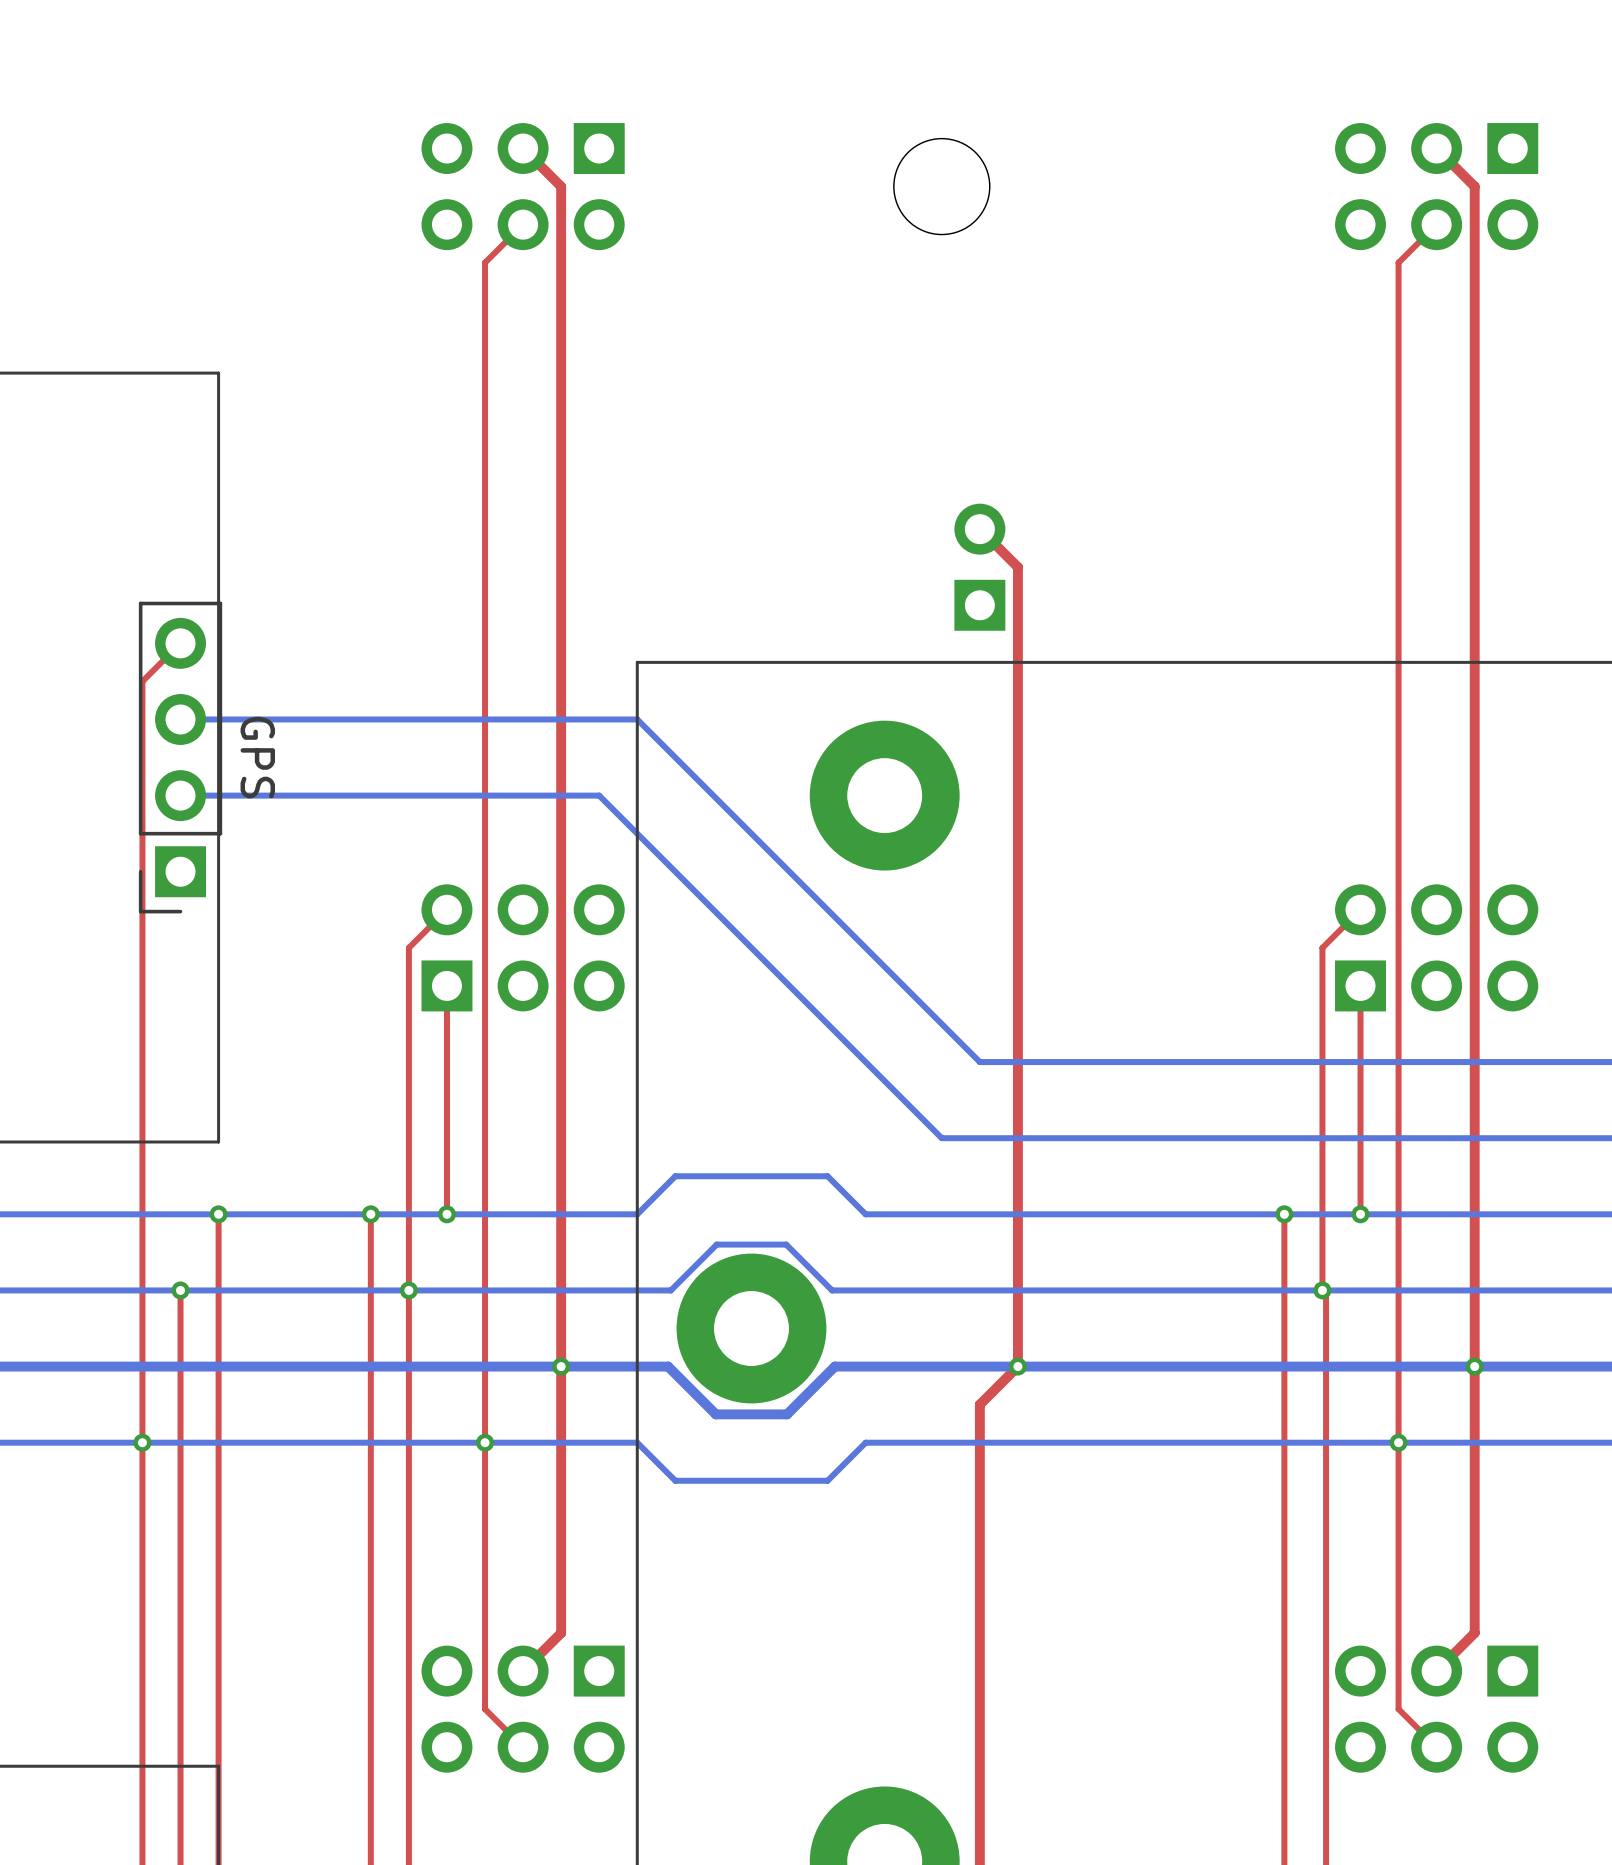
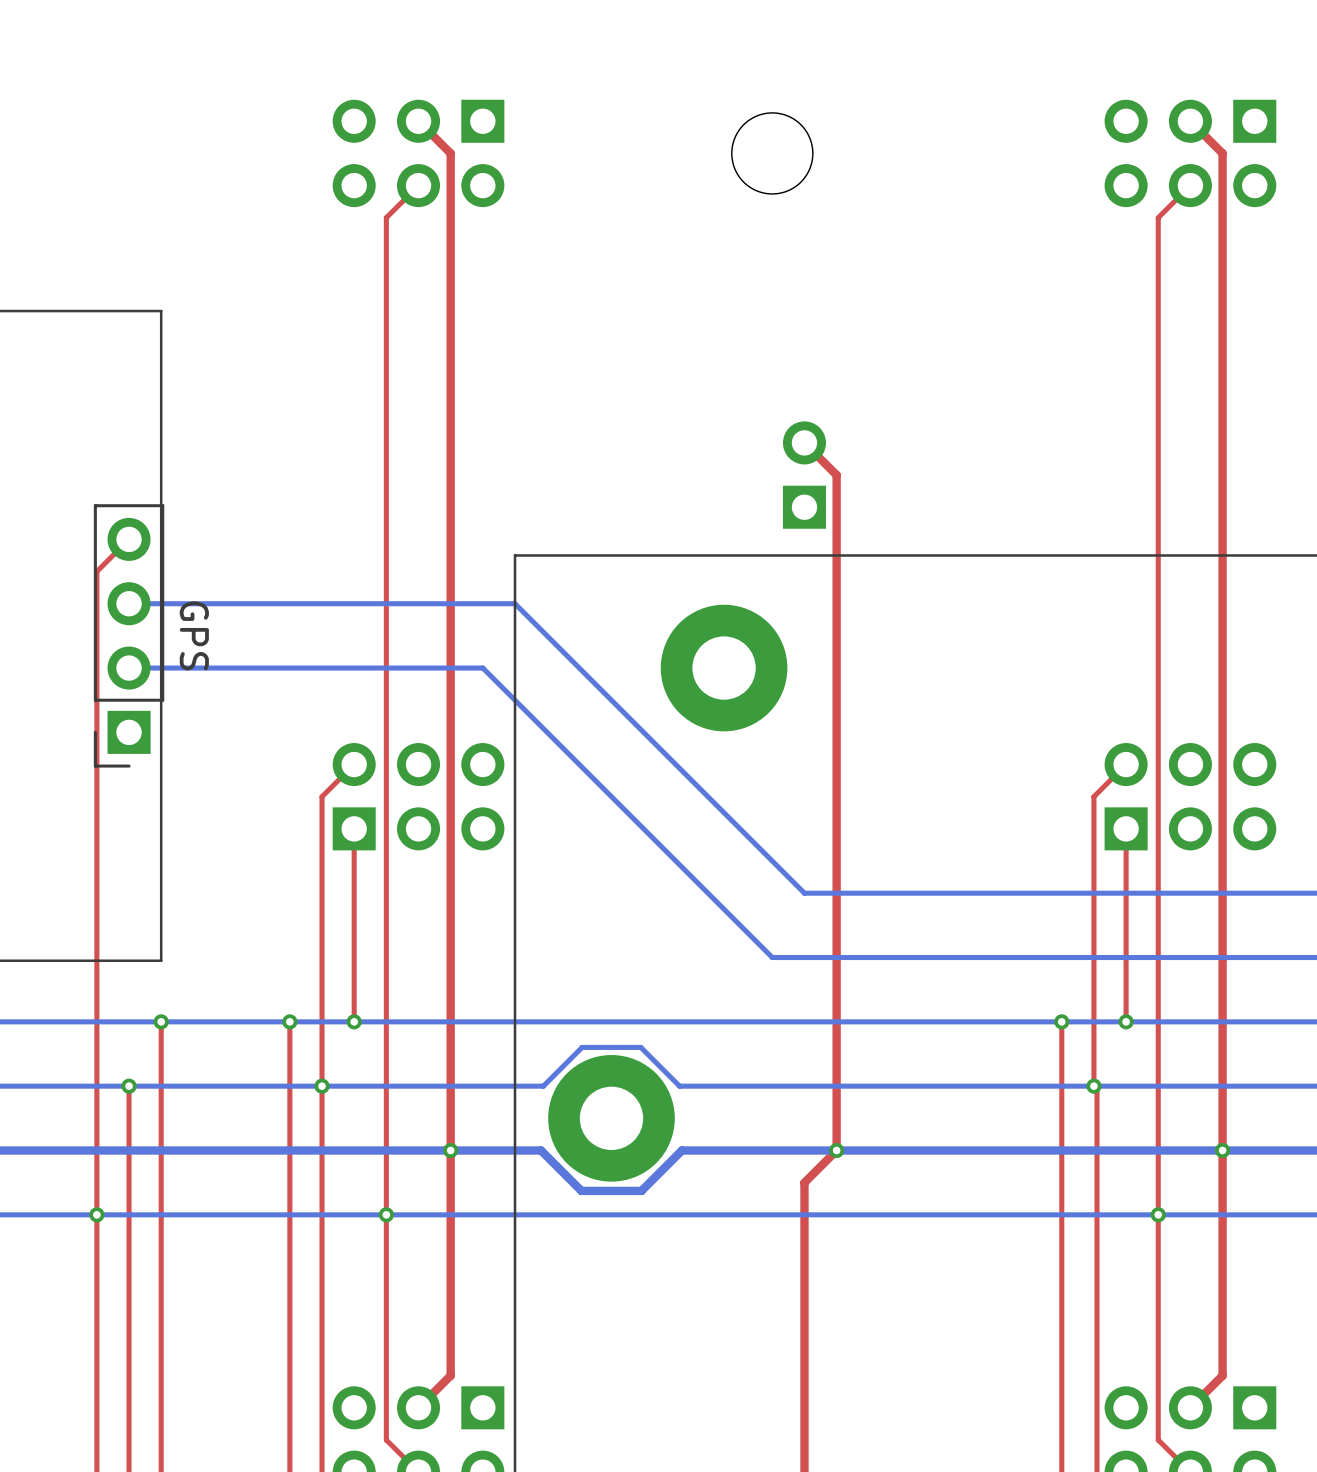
bottom track: (865, 1214) (827, 1176) (675, 1176) (637, 1214) -> (707, 1021) (515, 1021)
bottom track: (865, 1442) (827, 1480) (675, 1480) (637, 1442) -> (707, 1214) (515, 1214)

